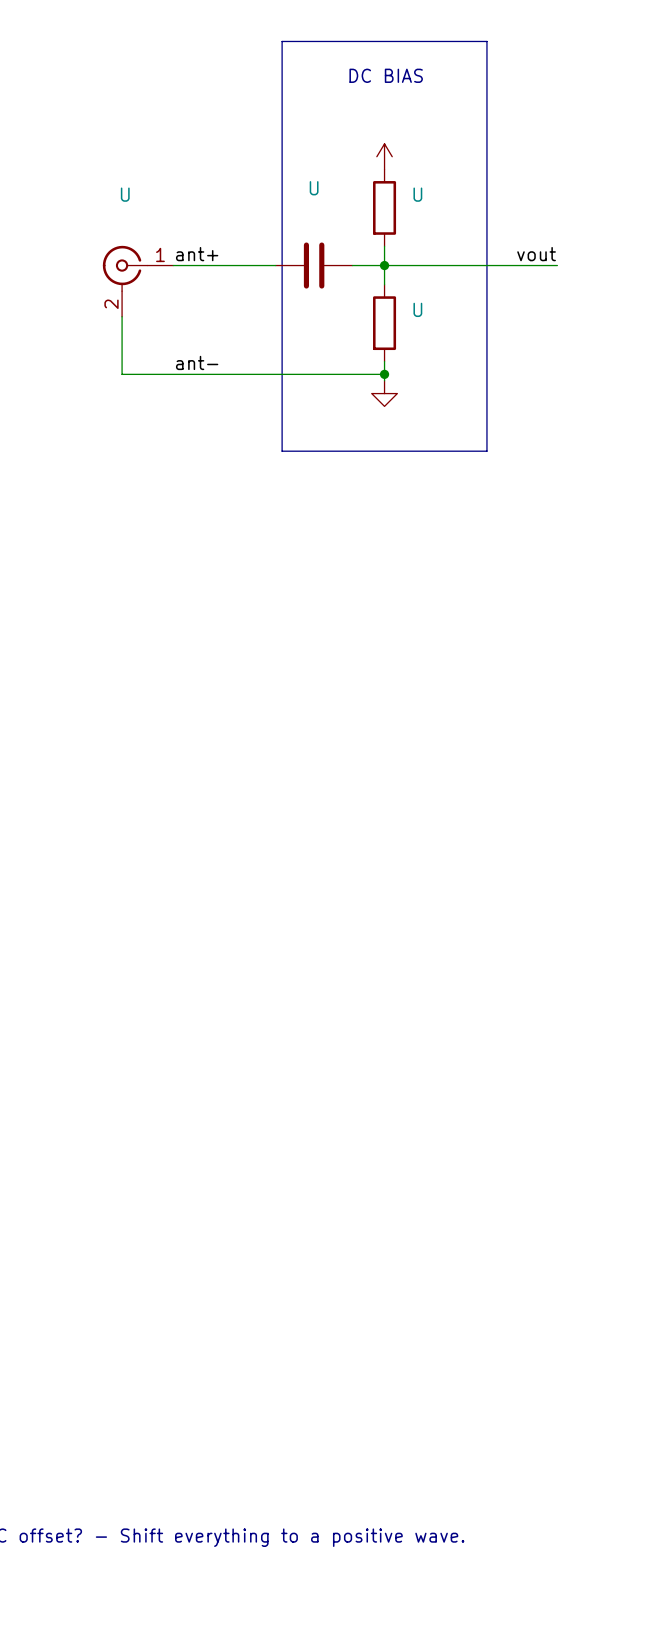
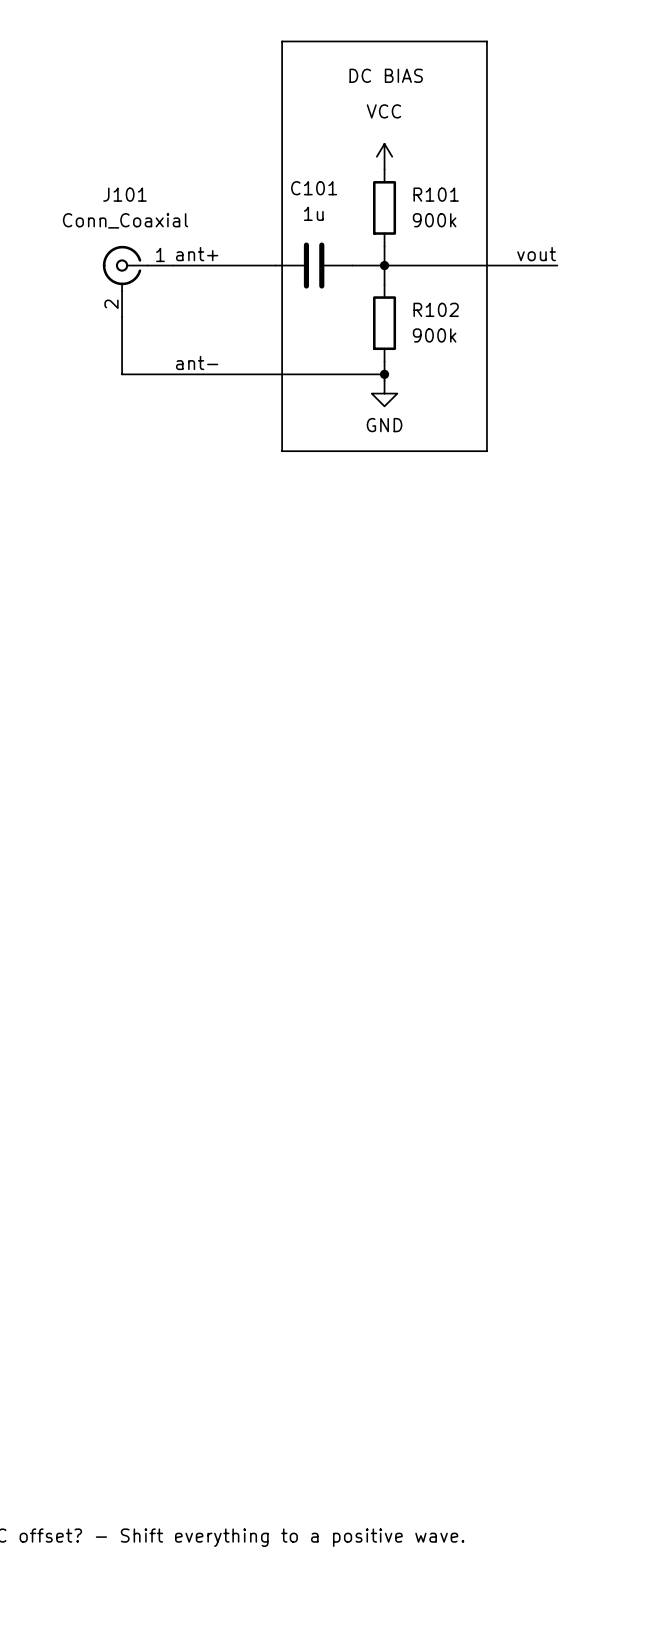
power symbol text: none -> VCC (383, 111)
U name: U (314, 188) -> C101 (314, 188)
U name: U (125, 194) -> J101 (124, 194)
U name: U (417, 194) -> R101 (436, 194)
U value: none -> 1u (313, 213)
U value: none -> Conn_Coaxial (125, 220)
U value: none -> 900k (434, 220)
U name: U (417, 309) -> R102 (436, 309)
U value: none -> 900k (434, 335)
power symbol text: none -> GND (384, 425)

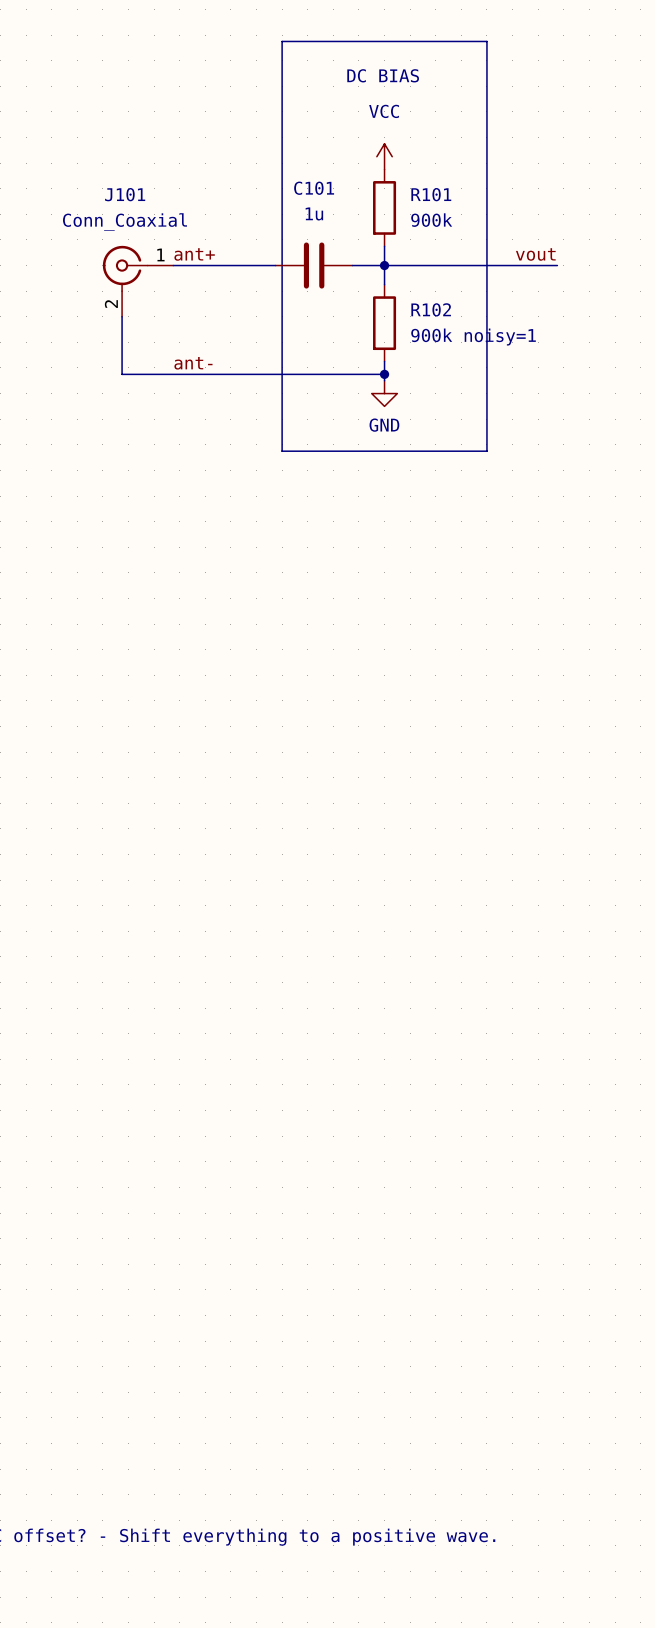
R102 value: 900k (434, 335) -> 900k noisy=1 (473, 337)

